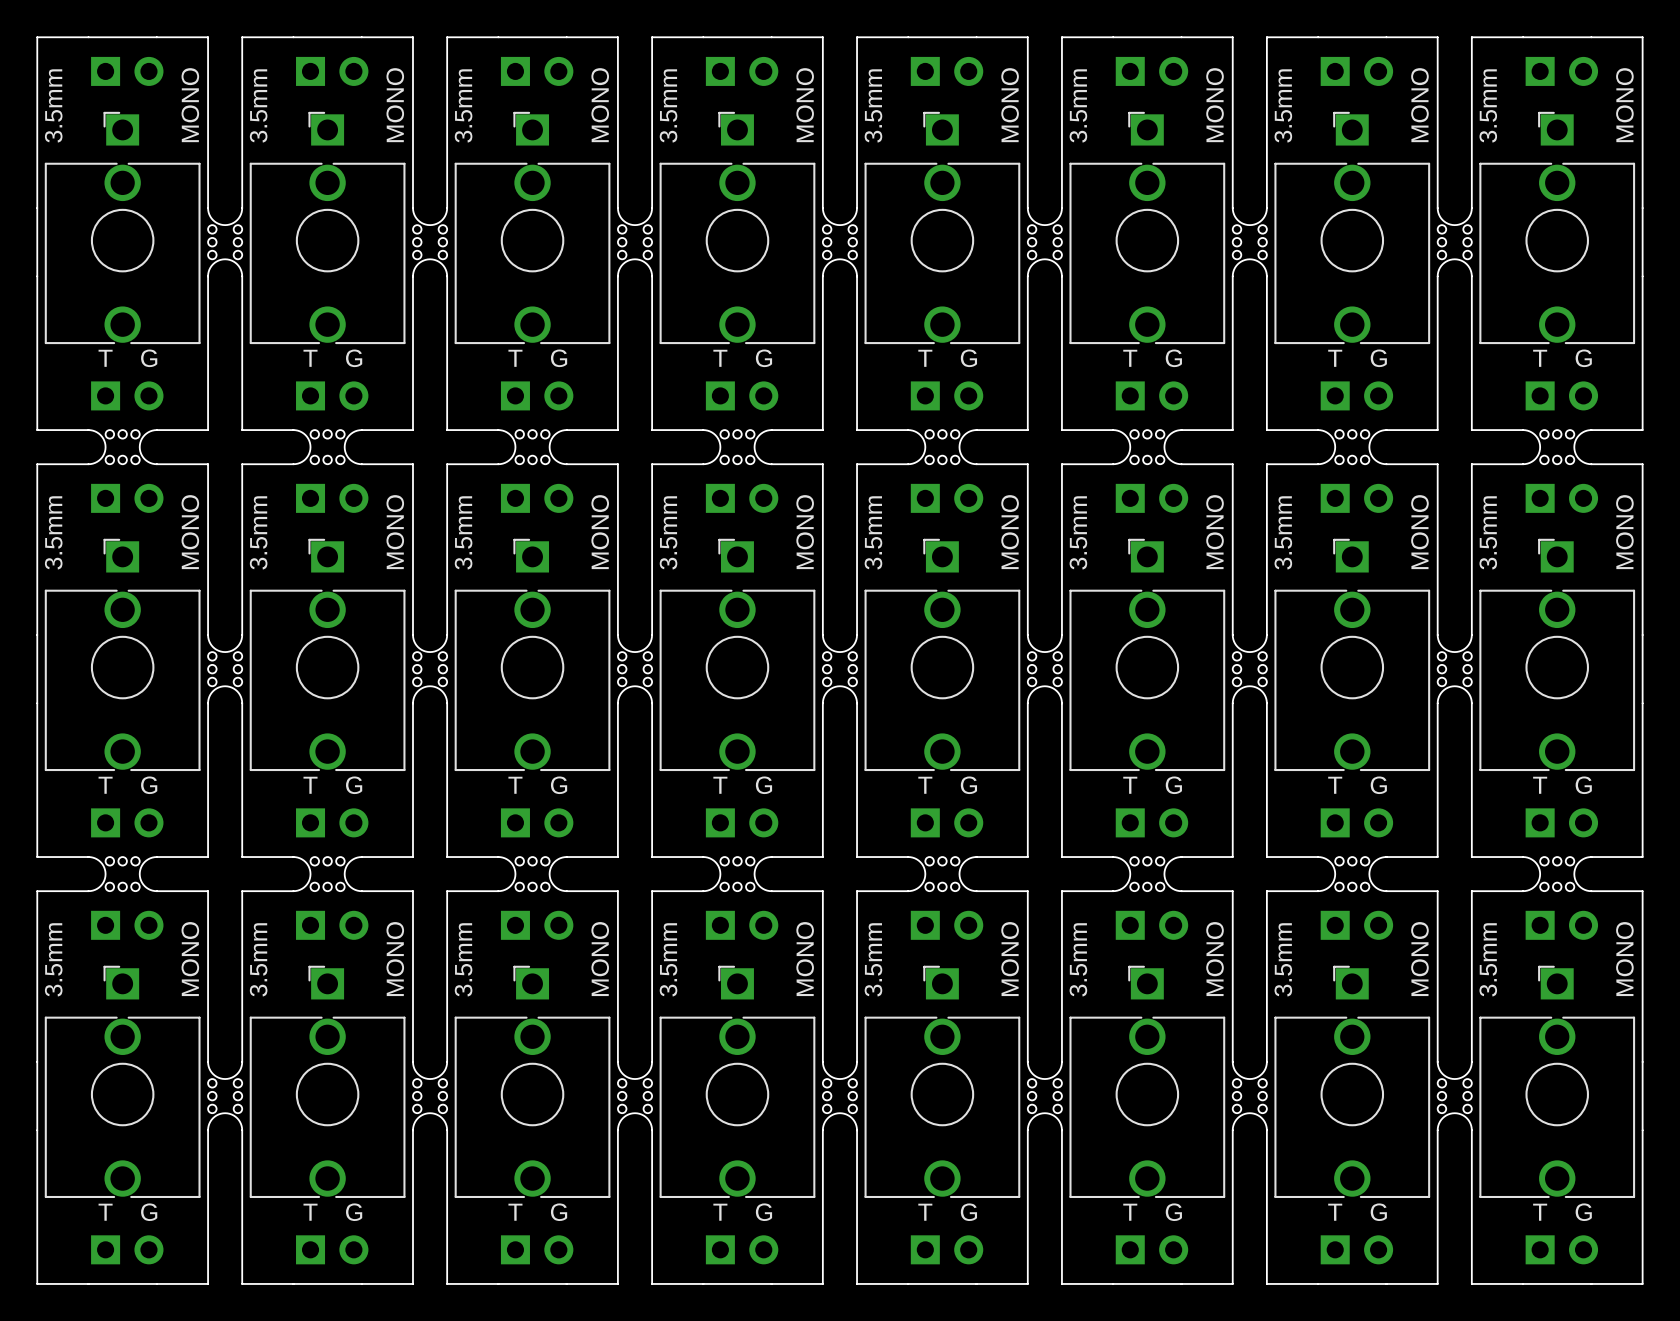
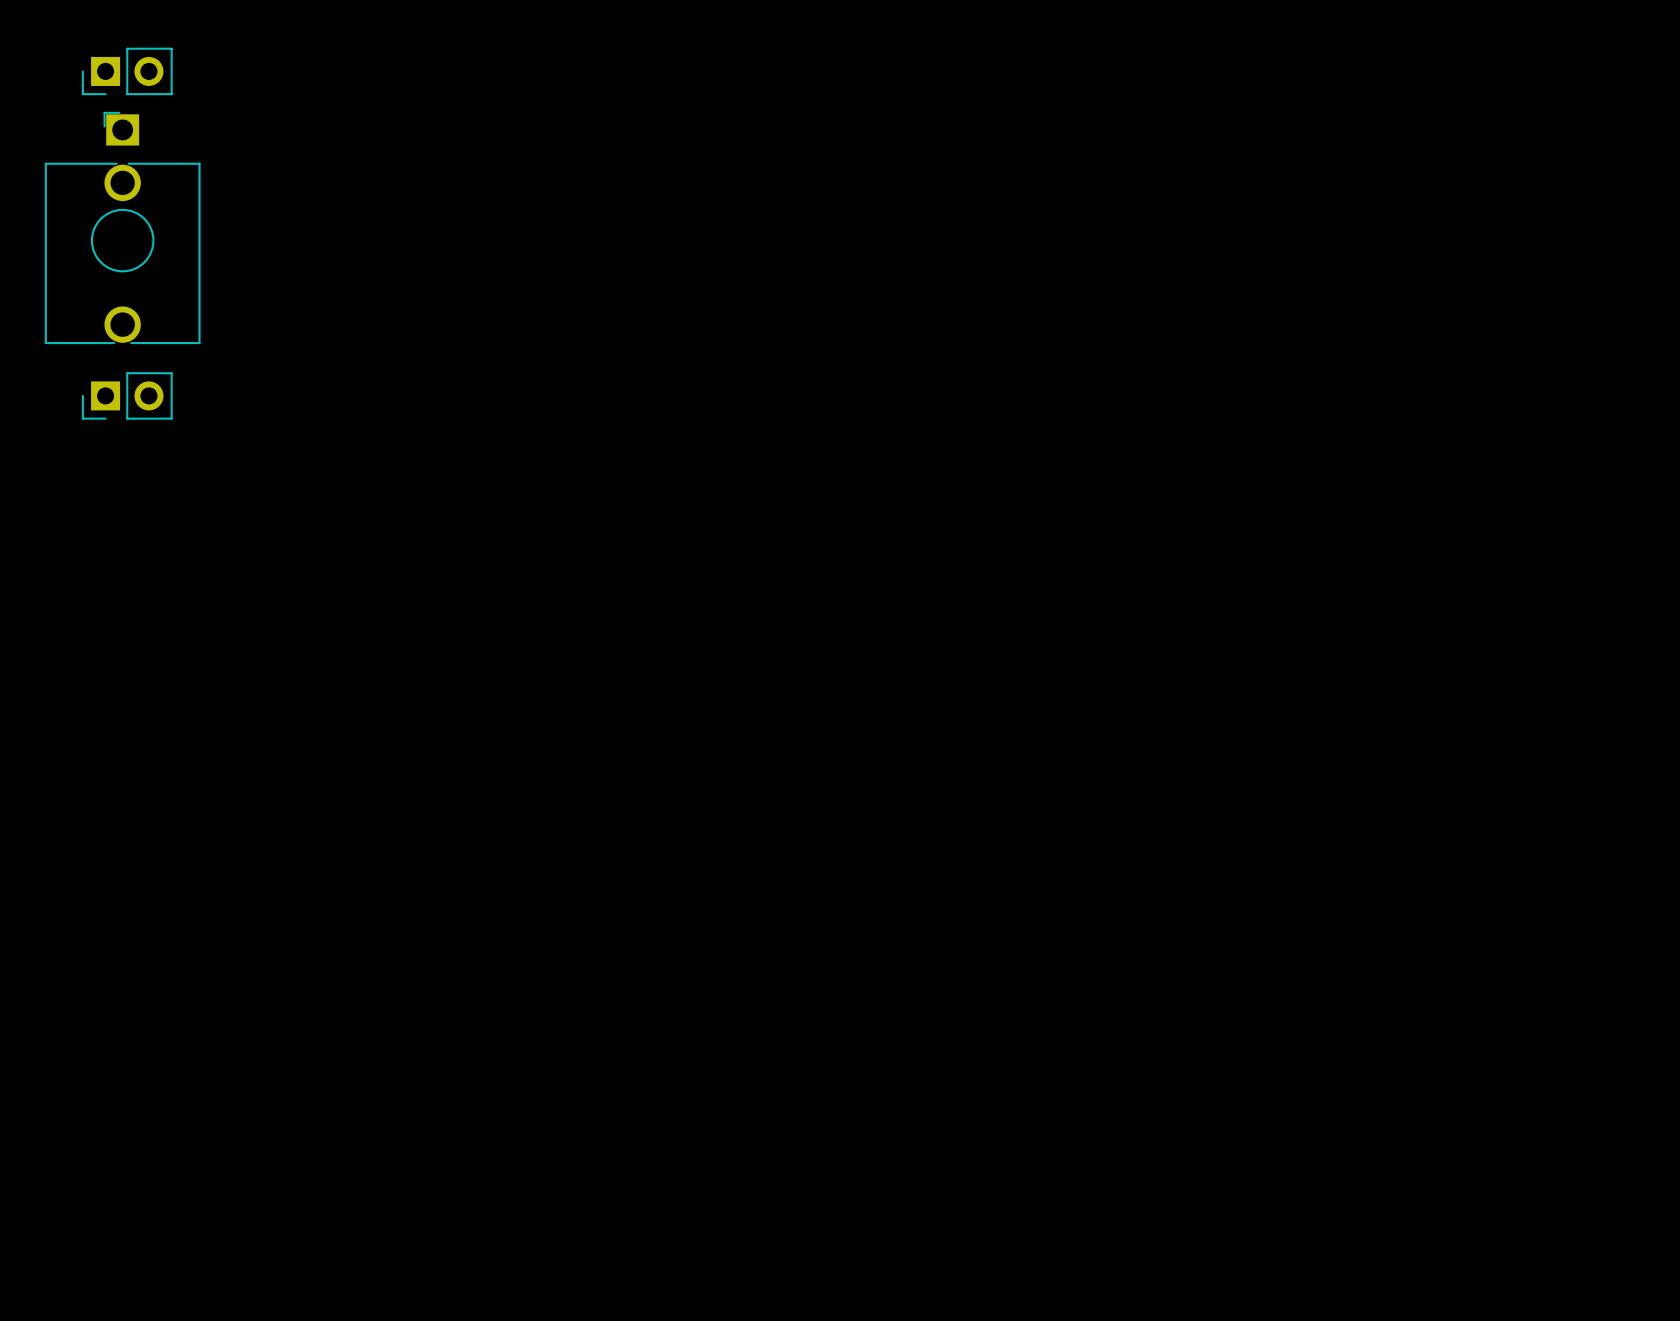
part side: bottom (127, 71) -> top (127, 71)
part: (332, 71) -> none
part: (537, 71) -> none
part: (742, 71) -> none
part: (947, 71) -> none
part: (1151, 71) -> none
part: (1356, 71) -> none
part: (1561, 71) -> none
text: 3.5mm (53, 105) -> none
text: MONO (190, 105) -> none
text: 3.5mm (258, 105) -> none
text: MONO (395, 105) -> none
text: 3.5mm (463, 105) -> none
text: MONO (600, 105) -> none
text: 3.5mm (668, 105) -> none
text: MONO (805, 105) -> none
text: 3.5mm (873, 105) -> none
text: MONO (1010, 105) -> none
text: 3.5mm (1078, 105) -> none
text: MONO (1215, 105) -> none
text: 3.5mm (1283, 105) -> none
text: MONO (1419, 105) -> none
text: 3.5mm (1488, 105) -> none
text: MONO (1624, 105) -> none
board edge: (208, 208) (208, 37) (37, 37) (37, 430) (88, 430) -> none
board edge: (242, 208) (242, 37) (412, 37) (412, 208) -> none
board edge: (447, 208) (447, 37) (617, 37) (617, 208) -> none
board edge: (652, 208) (652, 37) (822, 37) (822, 208) -> none
board edge: (857, 208) (857, 37) (1027, 37) (1027, 208) -> none
board edge: (1061, 208) (1061, 37) (1232, 37) (1232, 208) -> none
board edge: (1266, 208) (1266, 37) (1437, 37) (1437, 208) -> none
board edge: (1471, 208) (1471, 37) (1642, 37) (1642, 430) (1591, 430) -> none
part: (327, 227) -> none
part: (532, 227) -> none
part: (737, 227) -> none
part: (942, 227) -> none
part: (1147, 227) -> none
part: (1352, 227) -> none
part: (1557, 227) -> none
part: (225, 242) -> none
part: (430, 242) -> none
part: (635, 242) -> none
part: (839, 242) -> none
part: (1044, 242) -> none
part: (1249, 242) -> none
part: (1454, 242) -> none
board edge: (208, 276) (208, 430) (156, 430) -> none
board edge: (242, 276) (242, 430) (293, 430) -> none
board edge: (412, 276) (412, 430) (361, 430) -> none
board edge: (447, 276) (447, 430) (498, 430) -> none
board edge: (617, 276) (617, 430) (566, 430) -> none
board edge: (652, 276) (652, 430) (703, 430) -> none
board edge: (822, 276) (822, 430) (771, 430) -> none
board edge: (857, 276) (857, 430) (908, 430) -> none
board edge: (1027, 276) (1027, 430) (976, 430) -> none
board edge: (1061, 276) (1061, 430) (1113, 430) -> none
board edge: (1232, 276) (1232, 430) (1181, 430) -> none
board edge: (1266, 276) (1266, 430) (1318, 430) -> none
board edge: (1437, 276) (1437, 430) (1386, 430) -> none
board edge: (1471, 276) (1471, 430) (1523, 430) -> none
text: T (105, 358) -> none
text: G (149, 358) -> none
text: T (310, 358) -> none
text: G (354, 358) -> none
text: T (515, 358) -> none
text: G (559, 358) -> none
text: T (720, 358) -> none
text: G (763, 358) -> none
text: T (925, 358) -> none
text: G (968, 358) -> none
text: T (1130, 358) -> none
text: G (1173, 358) -> none
text: T (1335, 358) -> none
text: G (1378, 358) -> none
text: T (1540, 358) -> none
text: G (1583, 358) -> none
part side: bottom (127, 395) -> top (127, 395)
part: (332, 395) -> none
part: (537, 395) -> none
part: (742, 395) -> none
part: (947, 395) -> none
part: (1151, 395) -> none
part: (1356, 395) -> none
part: (1561, 395) -> none
part: (122, 447) -> none
part: (327, 447) -> none
part: (532, 447) -> none
part: (737, 447) -> none
part: (942, 447) -> none
part: (1147, 447) -> none
part: (1352, 447) -> none
part: (1557, 447) -> none
board edge: (88, 464) (37, 464) (37, 857) (88, 857) -> none
board edge: (156, 464) (208, 464) (208, 635) -> none
board edge: (293, 464) (242, 464) (242, 635) -> none
board edge: (361, 464) (412, 464) (412, 635) -> none
board edge: (498, 464) (447, 464) (447, 635) -> none
board edge: (566, 464) (617, 464) (617, 635) -> none
board edge: (703, 464) (652, 464) (652, 635) -> none
board edge: (771, 464) (822, 464) (822, 635) -> none
board edge: (908, 464) (857, 464) (857, 635) -> none
board edge: (976, 464) (1027, 464) (1027, 635) -> none
board edge: (1113, 464) (1061, 464) (1061, 635) -> none
board edge: (1181, 464) (1232, 464) (1232, 635) -> none
board edge: (1318, 464) (1266, 464) (1266, 635) -> none
board edge: (1386, 464) (1437, 464) (1437, 635) -> none
board edge: (1523, 464) (1471, 464) (1471, 635) -> none
board edge: (1591, 464) (1642, 464) (1642, 857) (1591, 857) -> none
part: (127, 498) -> none
part: (332, 498) -> none
part: (537, 498) -> none
part: (742, 498) -> none
part: (947, 498) -> none
part: (1151, 498) -> none
part: (1356, 498) -> none
part: (1561, 498) -> none
text: 3.5mm (53, 532) -> none
text: MONO (190, 532) -> none
text: 3.5mm (258, 532) -> none
text: MONO (395, 532) -> none
text: 3.5mm (463, 532) -> none
text: MONO (600, 532) -> none
text: 3.5mm (668, 532) -> none
text: MONO (805, 532) -> none
text: 3.5mm (873, 532) -> none
text: MONO (1010, 532) -> none
text: 3.5mm (1078, 532) -> none
text: MONO (1215, 532) -> none
text: 3.5mm (1283, 532) -> none
text: MONO (1419, 532) -> none
text: 3.5mm (1488, 532) -> none
text: MONO (1624, 532) -> none
part: (122, 654) -> none
part: (327, 654) -> none
part: (532, 654) -> none
part: (737, 654) -> none
part: (942, 654) -> none
part: (1147, 654) -> none
part: (1352, 654) -> none
part: (1557, 654) -> none
part: (225, 669) -> none
part: (430, 669) -> none
part: (635, 669) -> none
part: (839, 669) -> none
part: (1044, 669) -> none
part: (1249, 669) -> none
part: (1454, 669) -> none
board edge: (208, 703) (208, 857) (156, 857) -> none
board edge: (242, 703) (242, 857) (293, 857) -> none
board edge: (412, 703) (412, 857) (361, 857) -> none
board edge: (447, 703) (447, 857) (498, 857) -> none
board edge: (617, 703) (617, 857) (566, 857) -> none
board edge: (652, 703) (652, 857) (703, 857) -> none
board edge: (822, 703) (822, 857) (771, 857) -> none
board edge: (857, 703) (857, 857) (908, 857) -> none
board edge: (1027, 703) (1027, 857) (976, 857) -> none
board edge: (1061, 703) (1061, 857) (1113, 857) -> none
board edge: (1232, 703) (1232, 857) (1181, 857) -> none
board edge: (1266, 703) (1266, 857) (1318, 857) -> none
board edge: (1437, 703) (1437, 857) (1386, 857) -> none
board edge: (1471, 703) (1471, 857) (1523, 857) -> none
text: T (105, 785) -> none
text: G (149, 785) -> none
text: T (310, 785) -> none
text: G (354, 785) -> none
text: T (515, 785) -> none
text: G (559, 785) -> none
text: T (720, 785) -> none
text: G (763, 785) -> none
text: T (925, 785) -> none
text: G (968, 785) -> none
text: T (1130, 785) -> none
text: G (1173, 785) -> none
text: T (1335, 785) -> none
text: G (1378, 785) -> none
text: T (1540, 785) -> none
text: G (1583, 785) -> none
part: (127, 822) -> none
part: (332, 822) -> none
part: (537, 822) -> none
part: (742, 822) -> none
part: (947, 822) -> none
part: (1151, 822) -> none
part: (1356, 822) -> none
part: (1561, 822) -> none
part: (122, 874) -> none
part: (327, 874) -> none
part: (532, 874) -> none
part: (737, 874) -> none
part: (942, 874) -> none
part: (1147, 874) -> none
part: (1352, 874) -> none
part: (1557, 874) -> none
board edge: (88, 891) (37, 891) (37, 1283) (208, 1283) (208, 1130) -> none
board edge: (156, 891) (208, 891) (208, 1061) -> none
board edge: (293, 891) (242, 891) (242, 1061) -> none
board edge: (361, 891) (412, 891) (412, 1061) -> none
board edge: (498, 891) (447, 891) (447, 1061) -> none
board edge: (566, 891) (617, 891) (617, 1061) -> none
board edge: (703, 891) (652, 891) (652, 1061) -> none
board edge: (771, 891) (822, 891) (822, 1061) -> none
board edge: (908, 891) (857, 891) (857, 1061) -> none
board edge: (976, 891) (1027, 891) (1027, 1061) -> none
board edge: (1113, 891) (1061, 891) (1061, 1061) -> none
board edge: (1181, 891) (1232, 891) (1232, 1061) -> none
board edge: (1318, 891) (1266, 891) (1266, 1061) -> none
board edge: (1386, 891) (1437, 891) (1437, 1061) -> none
board edge: (1523, 891) (1471, 891) (1471, 1061) -> none
board edge: (1591, 891) (1642, 891) (1642, 1283) (1471, 1283) (1471, 1130) -> none
part: (127, 925) -> none
part: (332, 925) -> none
part: (537, 925) -> none
part: (742, 925) -> none
part: (947, 925) -> none
part: (1151, 925) -> none
part: (1356, 925) -> none
part: (1561, 925) -> none
text: 3.5mm (53, 959) -> none
text: MONO (190, 959) -> none
text: 3.5mm (258, 959) -> none
text: MONO (395, 959) -> none
text: 3.5mm (463, 959) -> none
text: MONO (600, 959) -> none
text: 3.5mm (668, 959) -> none
text: MONO (805, 959) -> none
text: 3.5mm (873, 959) -> none
text: MONO (1010, 959) -> none
text: 3.5mm (1078, 959) -> none
text: MONO (1215, 959) -> none
text: 3.5mm (1283, 959) -> none
text: MONO (1419, 959) -> none
text: 3.5mm (1488, 959) -> none
text: MONO (1624, 959) -> none
part: (122, 1081) -> none
part: (327, 1081) -> none
part: (532, 1081) -> none
part: (737, 1081) -> none
part: (942, 1081) -> none
part: (1147, 1081) -> none
part: (1352, 1081) -> none
part: (1557, 1081) -> none
part: (225, 1096) -> none
part: (430, 1096) -> none
part: (635, 1096) -> none
part: (839, 1096) -> none
part: (1044, 1096) -> none
part: (1249, 1096) -> none
part: (1454, 1096) -> none
board edge: (242, 1130) (242, 1283) (412, 1283) (412, 1130) -> none
board edge: (447, 1130) (447, 1283) (617, 1283) (617, 1130) -> none
board edge: (652, 1130) (652, 1283) (822, 1283) (822, 1130) -> none
board edge: (857, 1130) (857, 1283) (1027, 1283) (1027, 1130) -> none
board edge: (1061, 1130) (1061, 1283) (1232, 1283) (1232, 1130) -> none
board edge: (1266, 1130) (1266, 1283) (1437, 1283) (1437, 1130) -> none
text: T (105, 1212) -> none
text: G (149, 1212) -> none
text: T (310, 1212) -> none
text: G (354, 1212) -> none
text: T (515, 1212) -> none
text: G (559, 1212) -> none
text: T (720, 1212) -> none
text: G (763, 1212) -> none
text: T (925, 1212) -> none
text: G (968, 1212) -> none
text: T (1130, 1212) -> none
text: G (1173, 1212) -> none
text: T (1335, 1212) -> none
text: G (1378, 1212) -> none
text: T (1540, 1212) -> none
text: G (1583, 1212) -> none
part: (127, 1249) -> none
part: (332, 1249) -> none
part: (537, 1249) -> none
part: (742, 1249) -> none
part: (947, 1249) -> none
part: (1151, 1249) -> none
part: (1356, 1249) -> none
part: (1561, 1249) -> none

